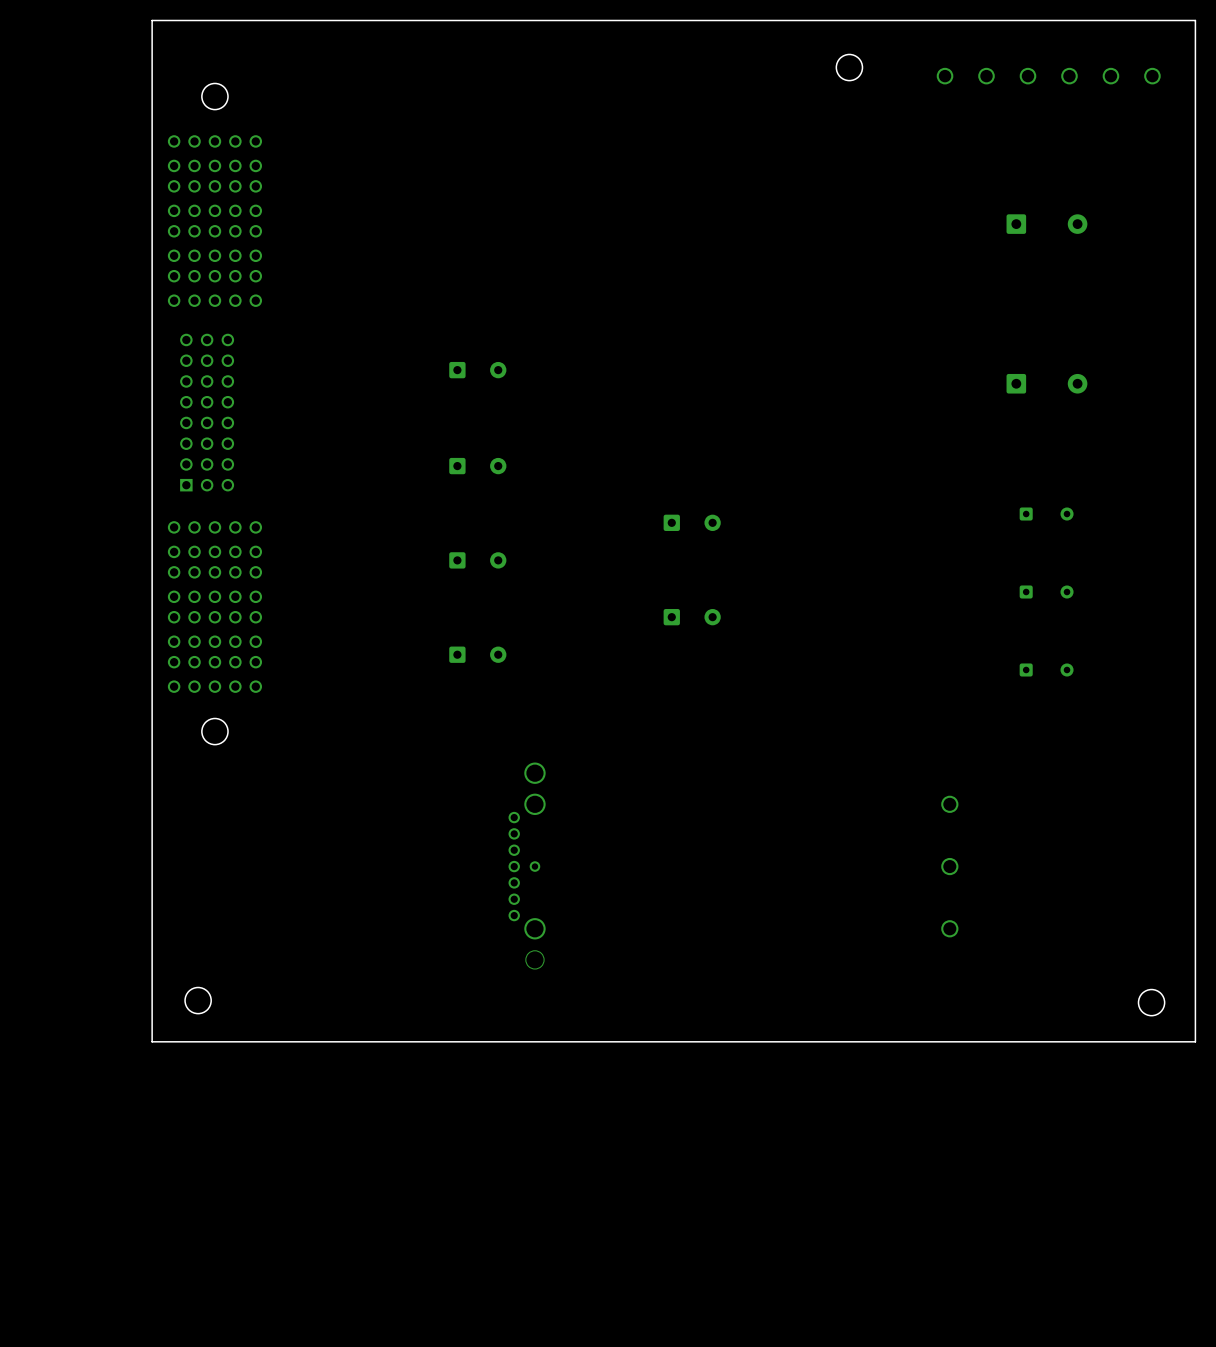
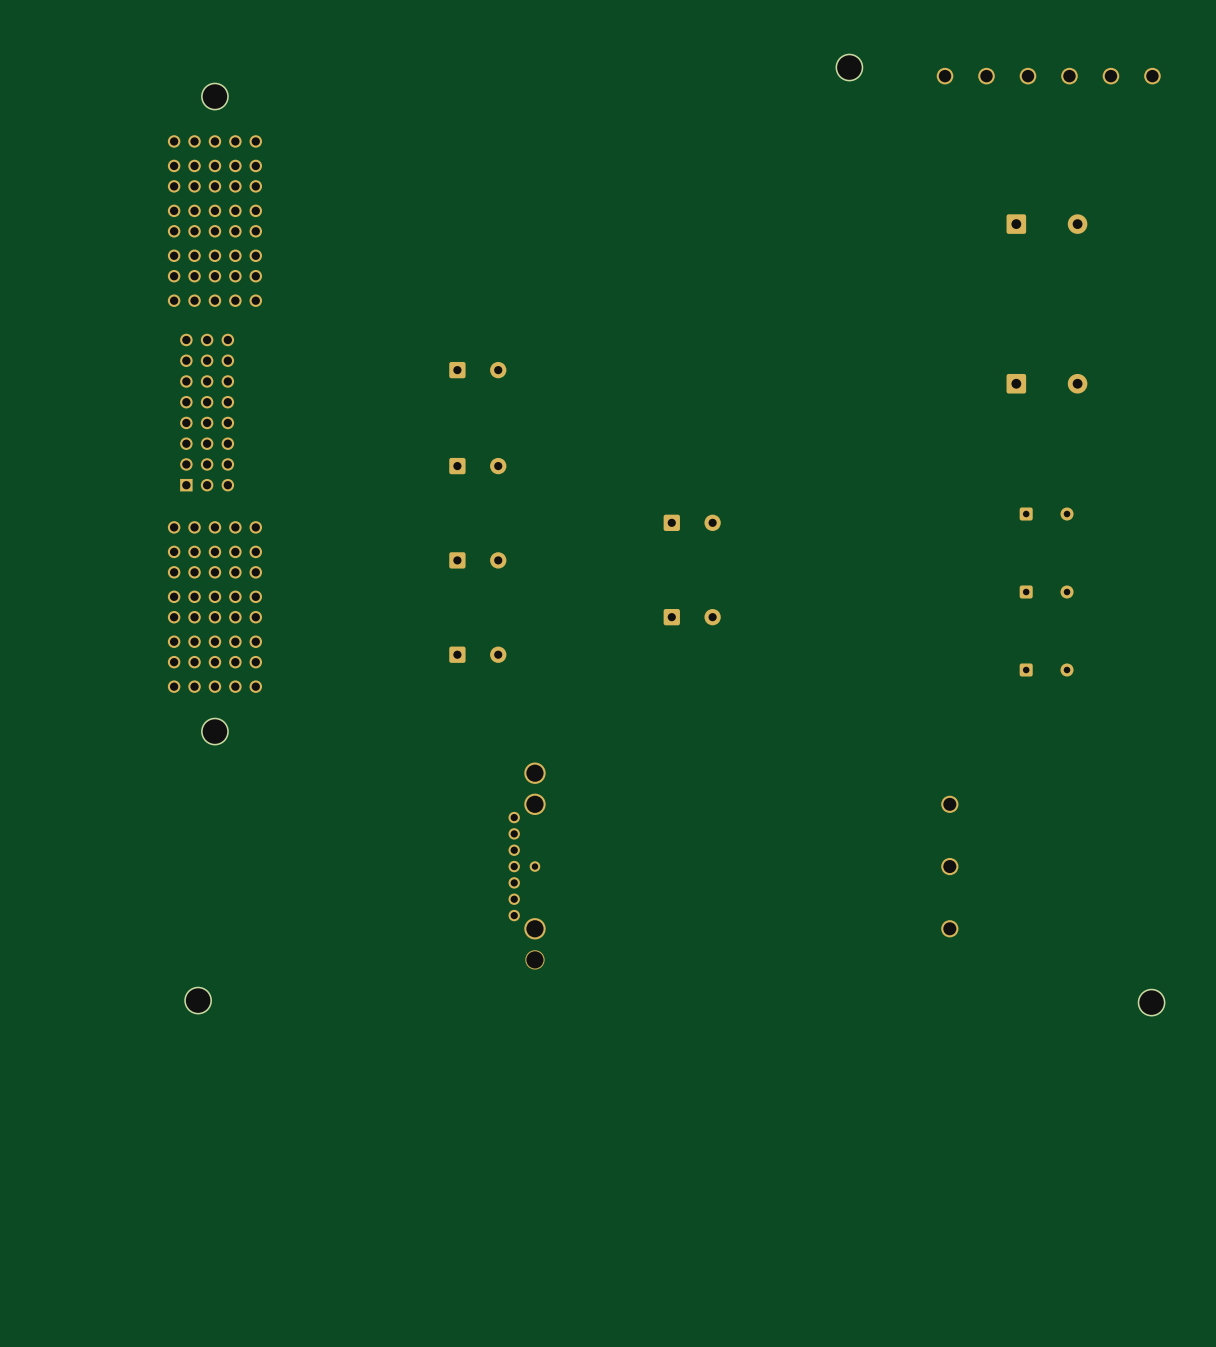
board edge: (1195, 20) (152, 20) (152, 1041) (1195, 1041) (1195, 20) -> none

